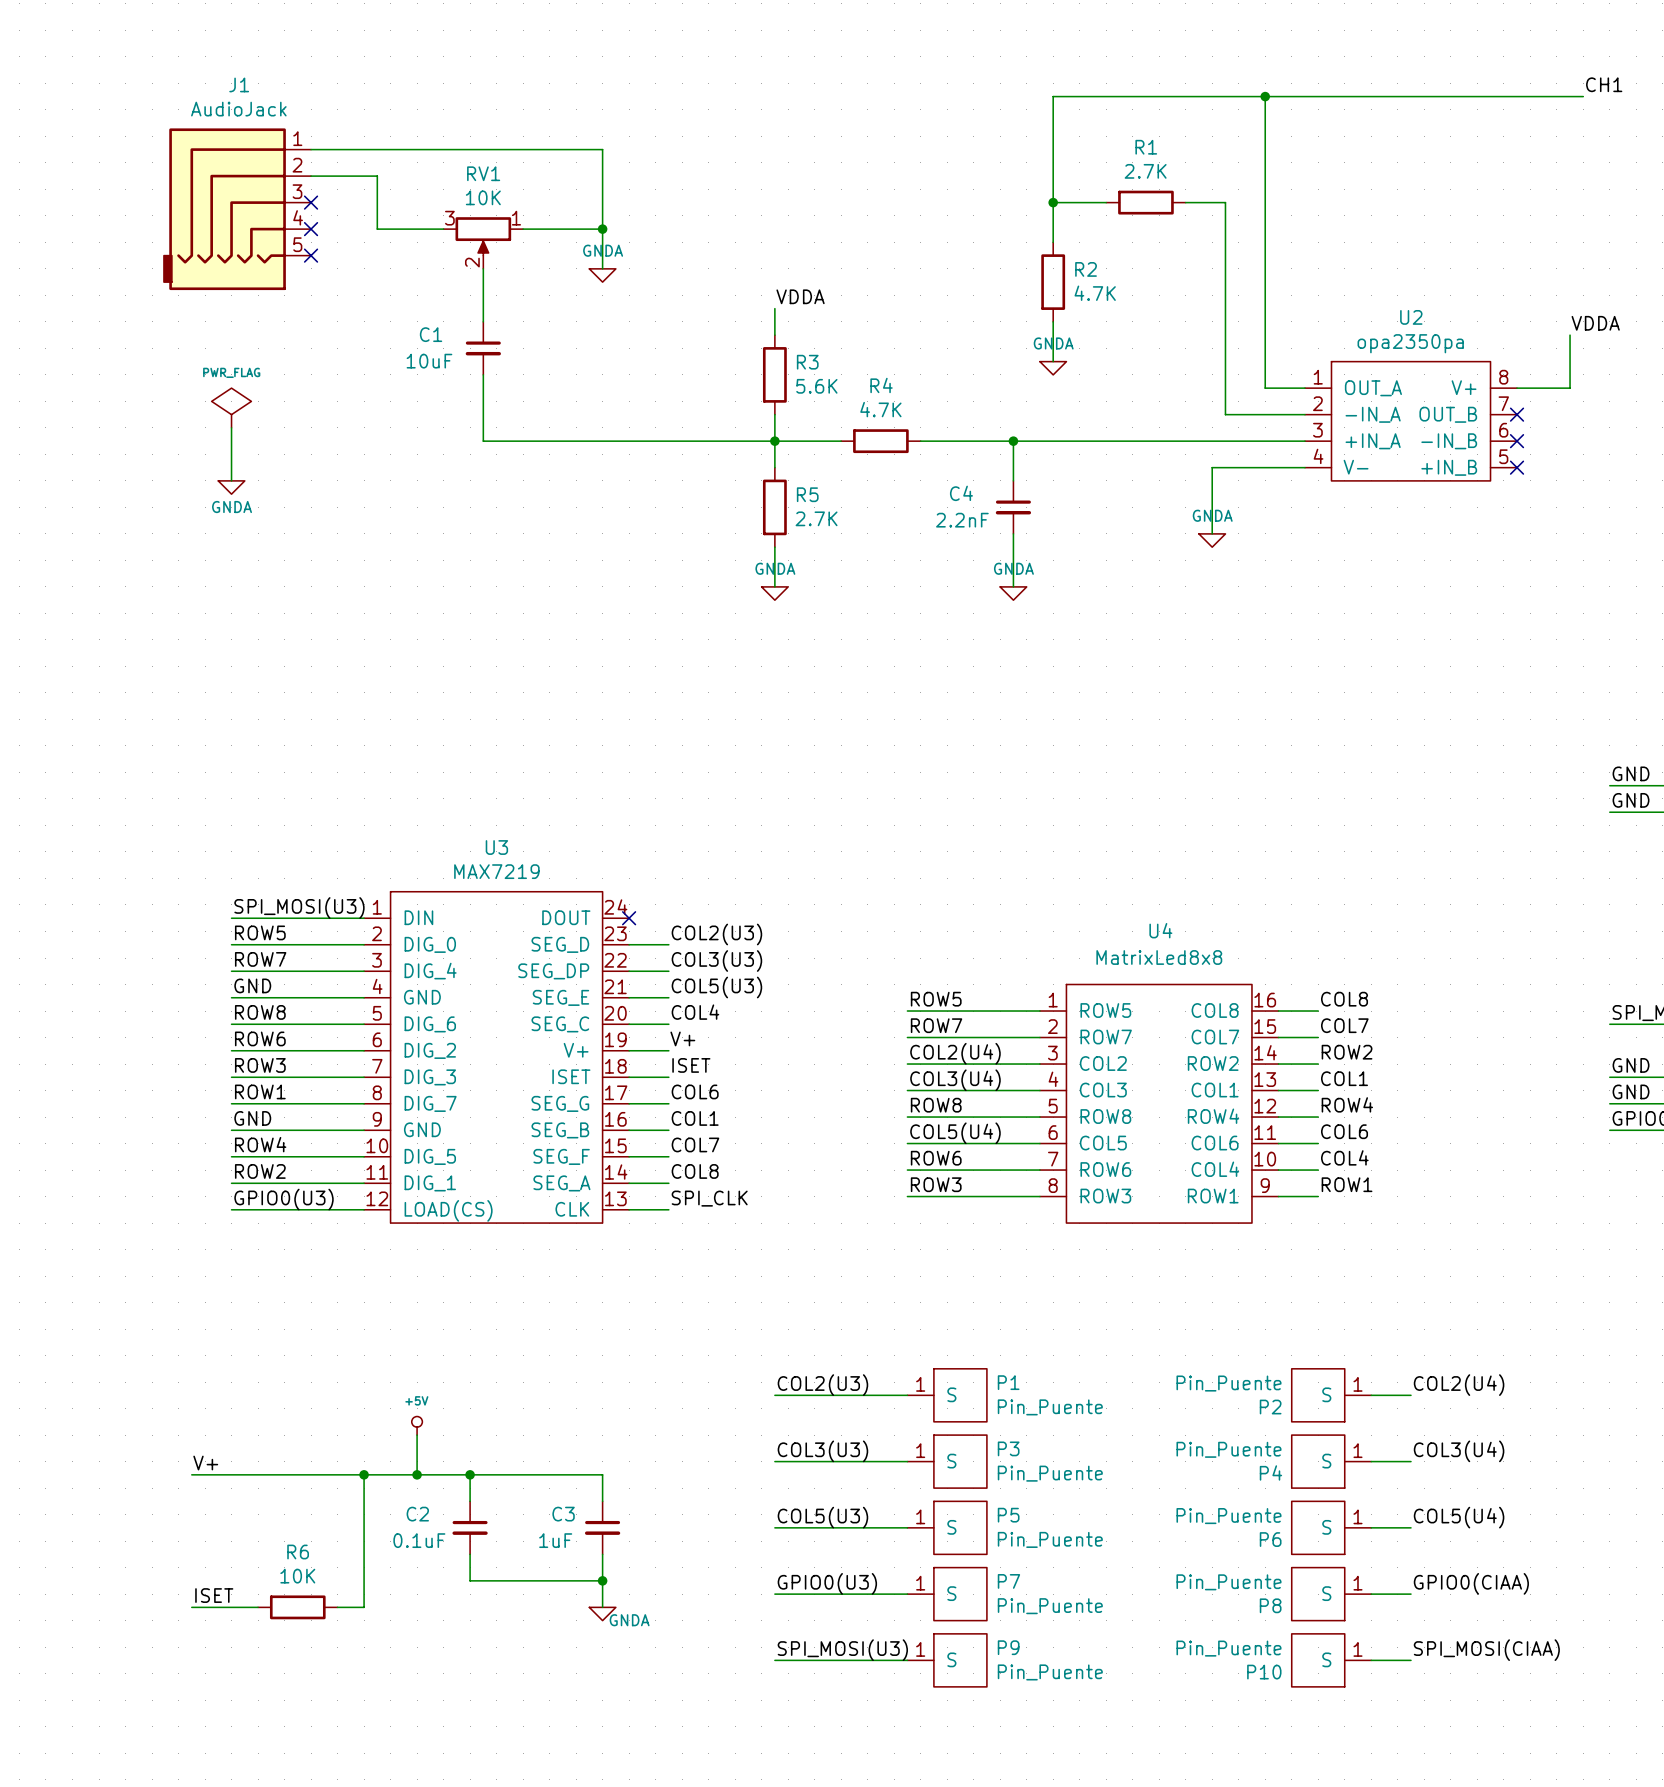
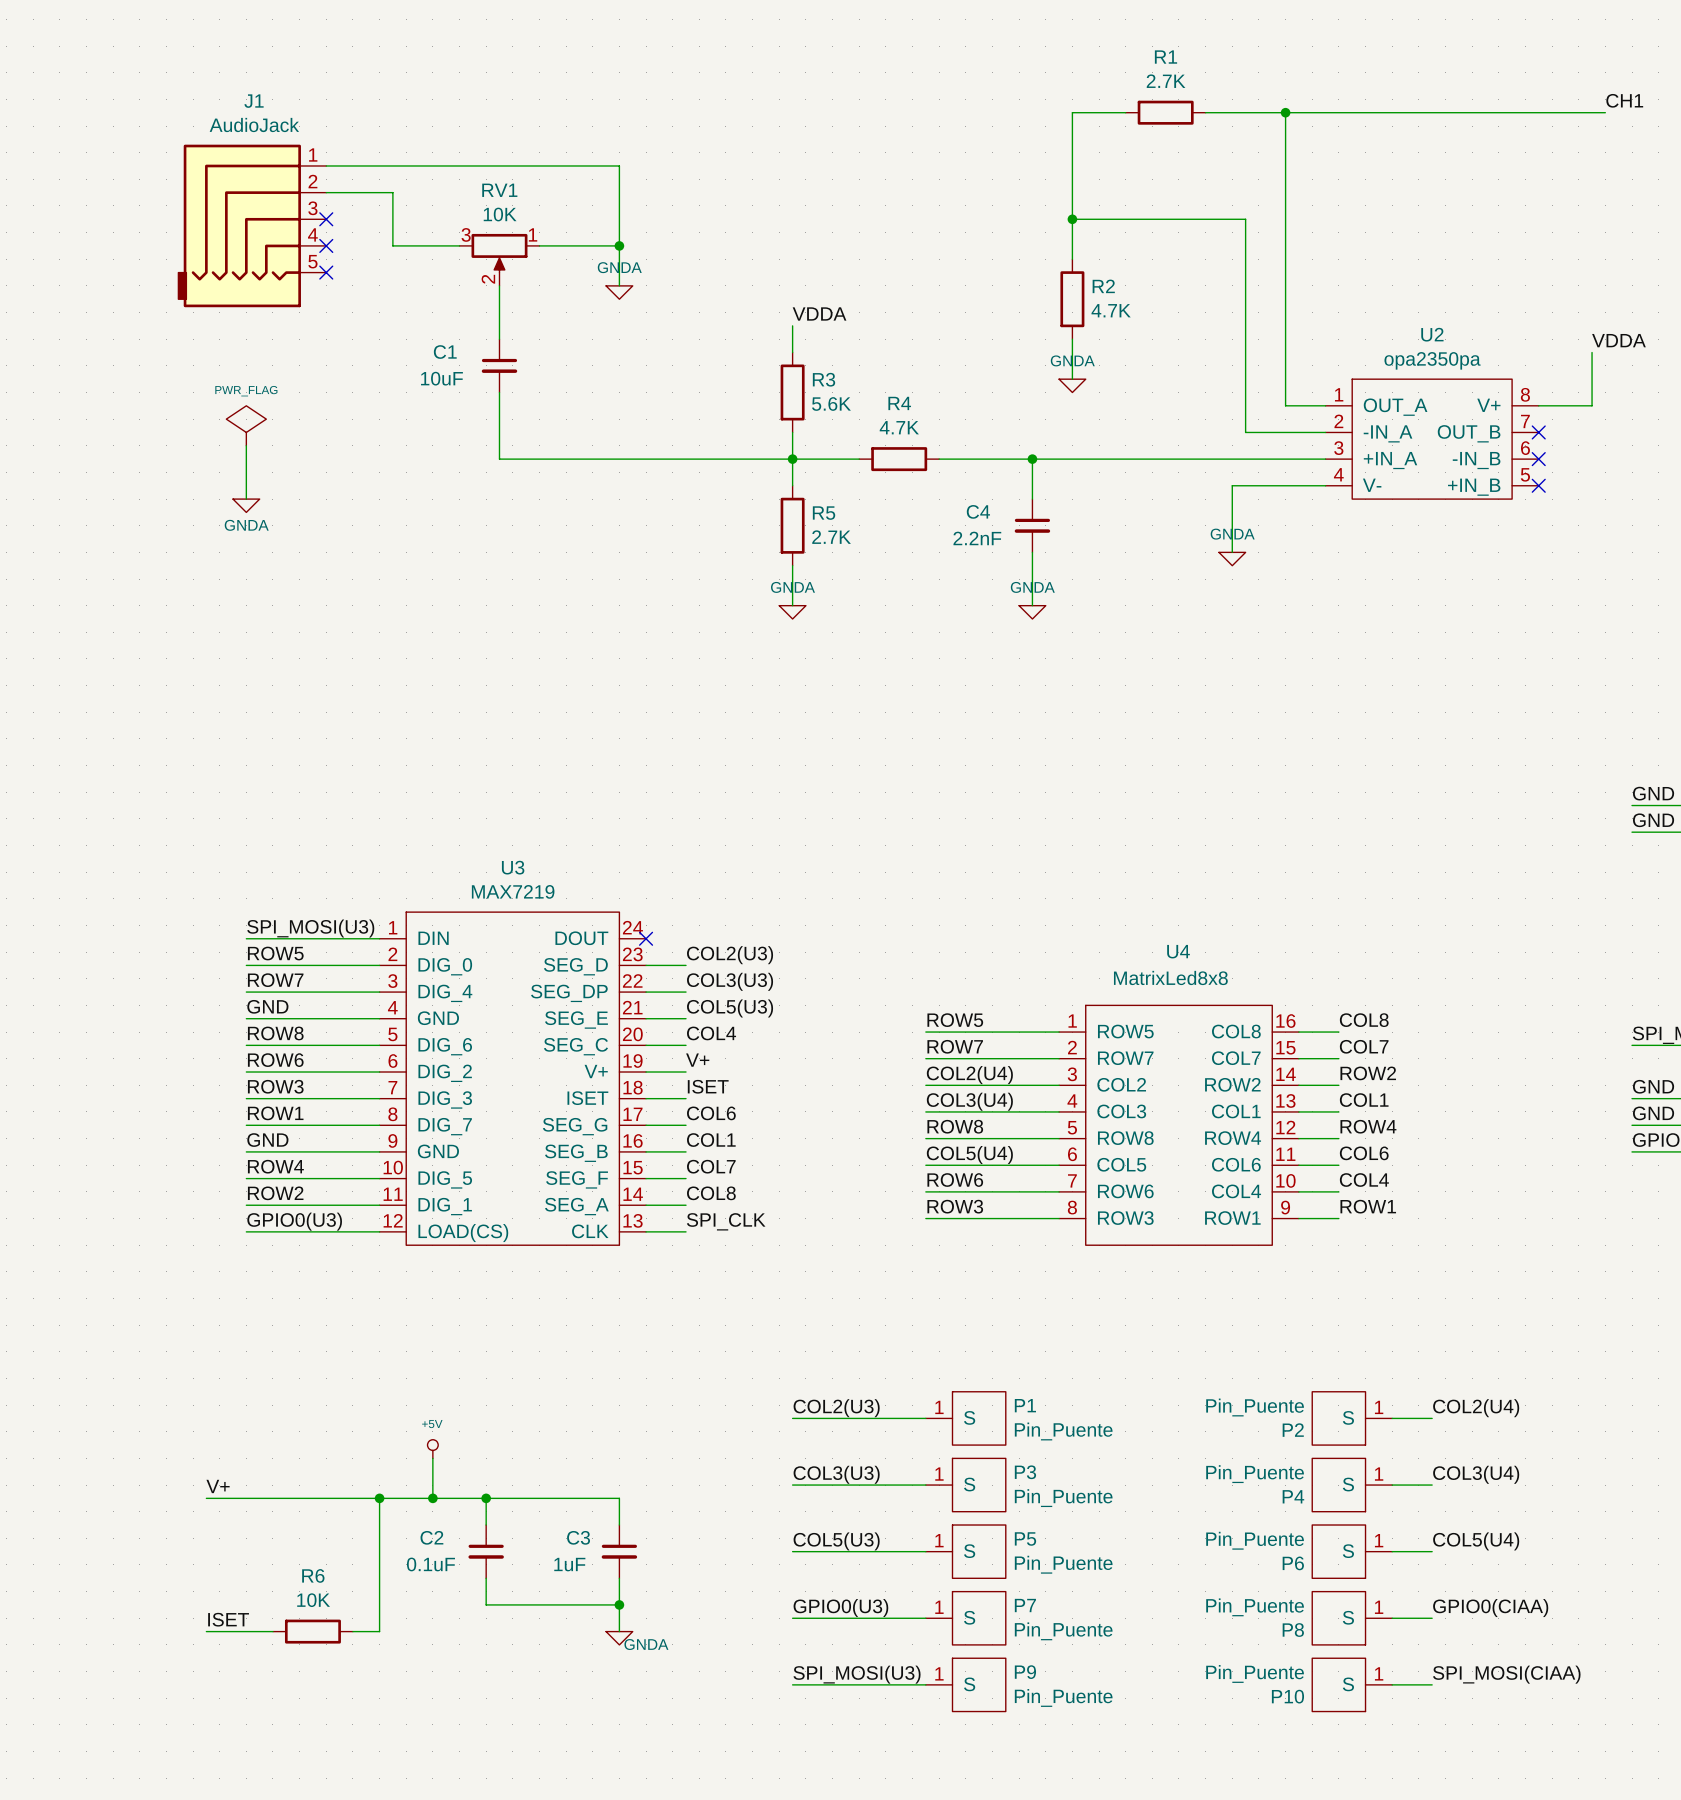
wire: (1106, 96) (1185, 96) -> (1125, 219) (1205, 219)
R1 position: (1145, 202) -> (1165, 112)

